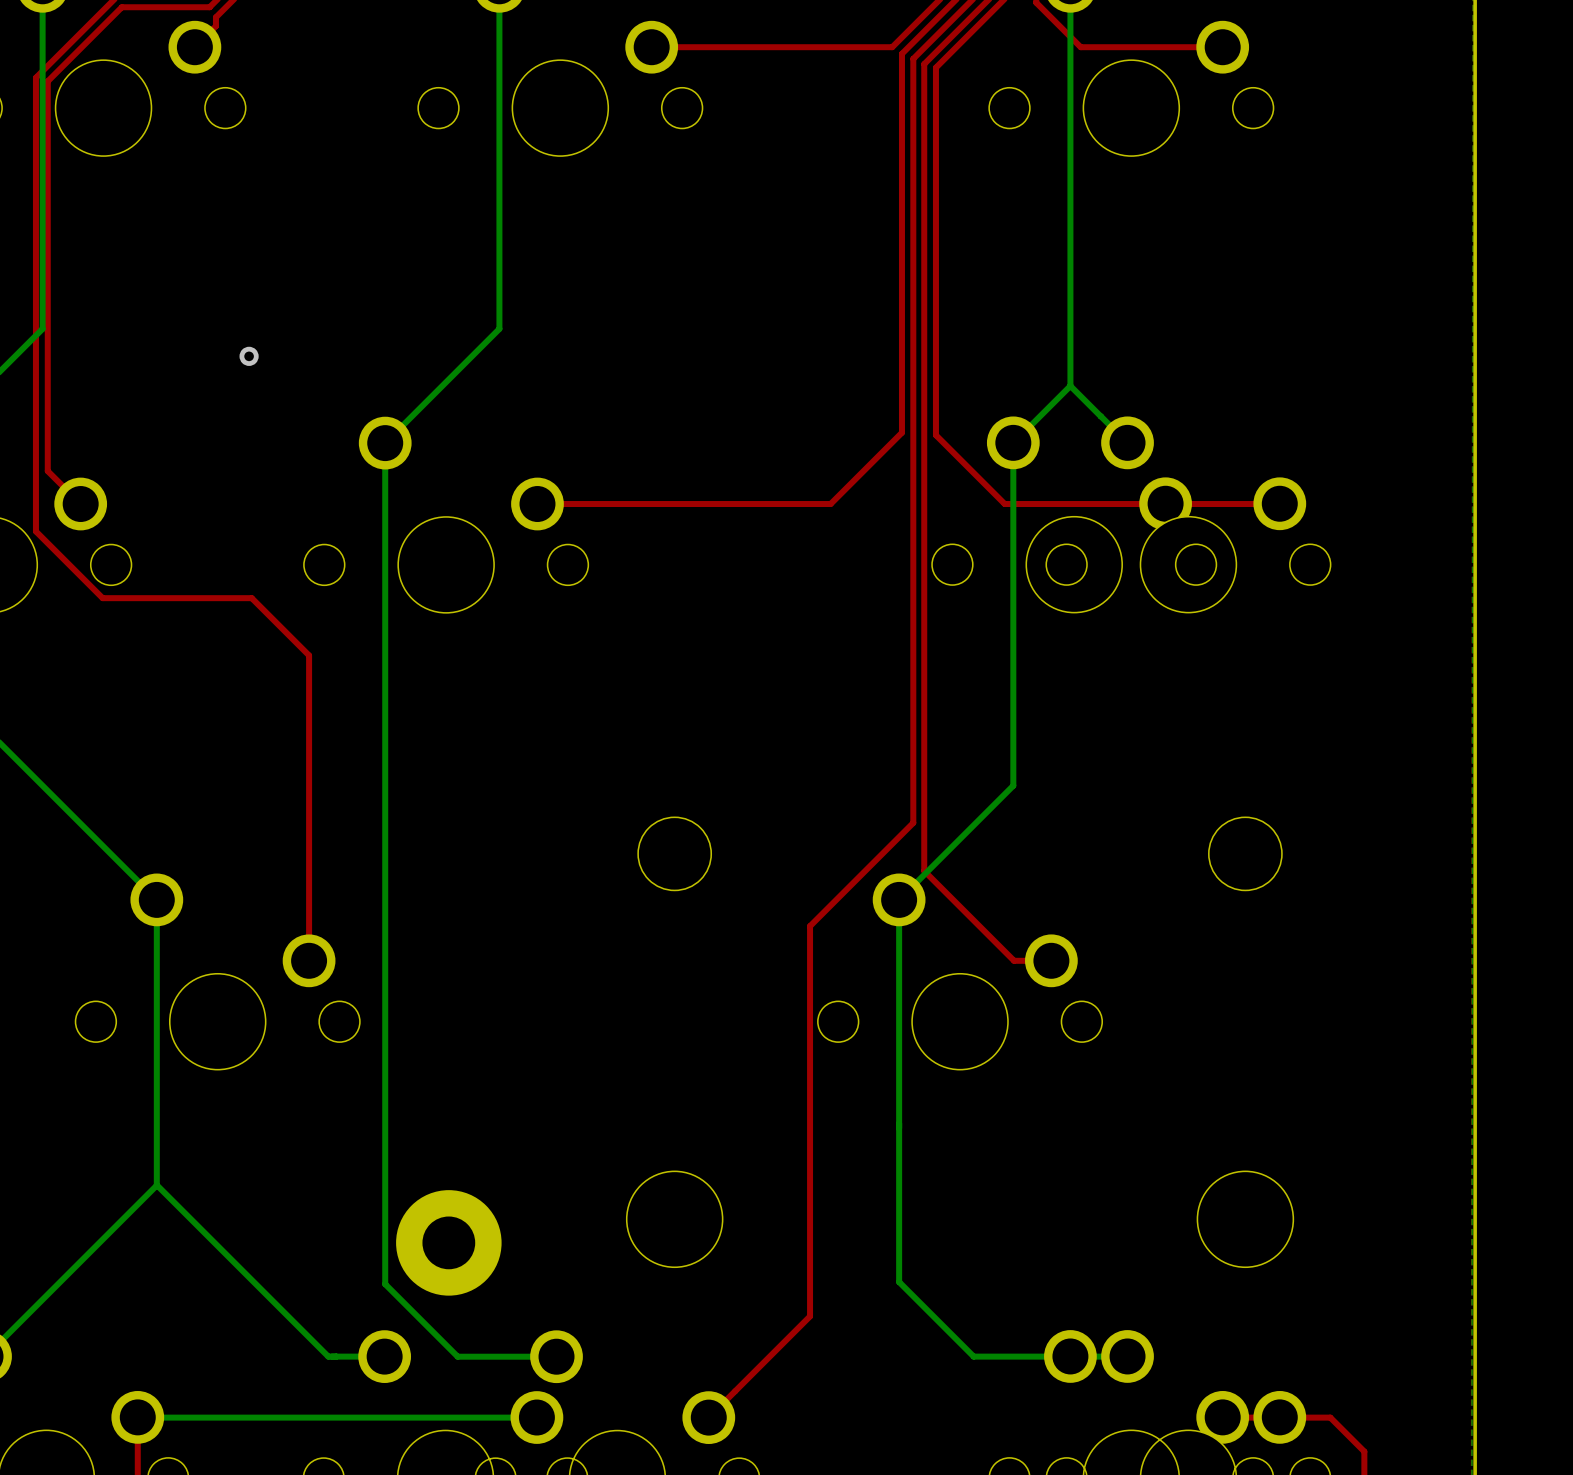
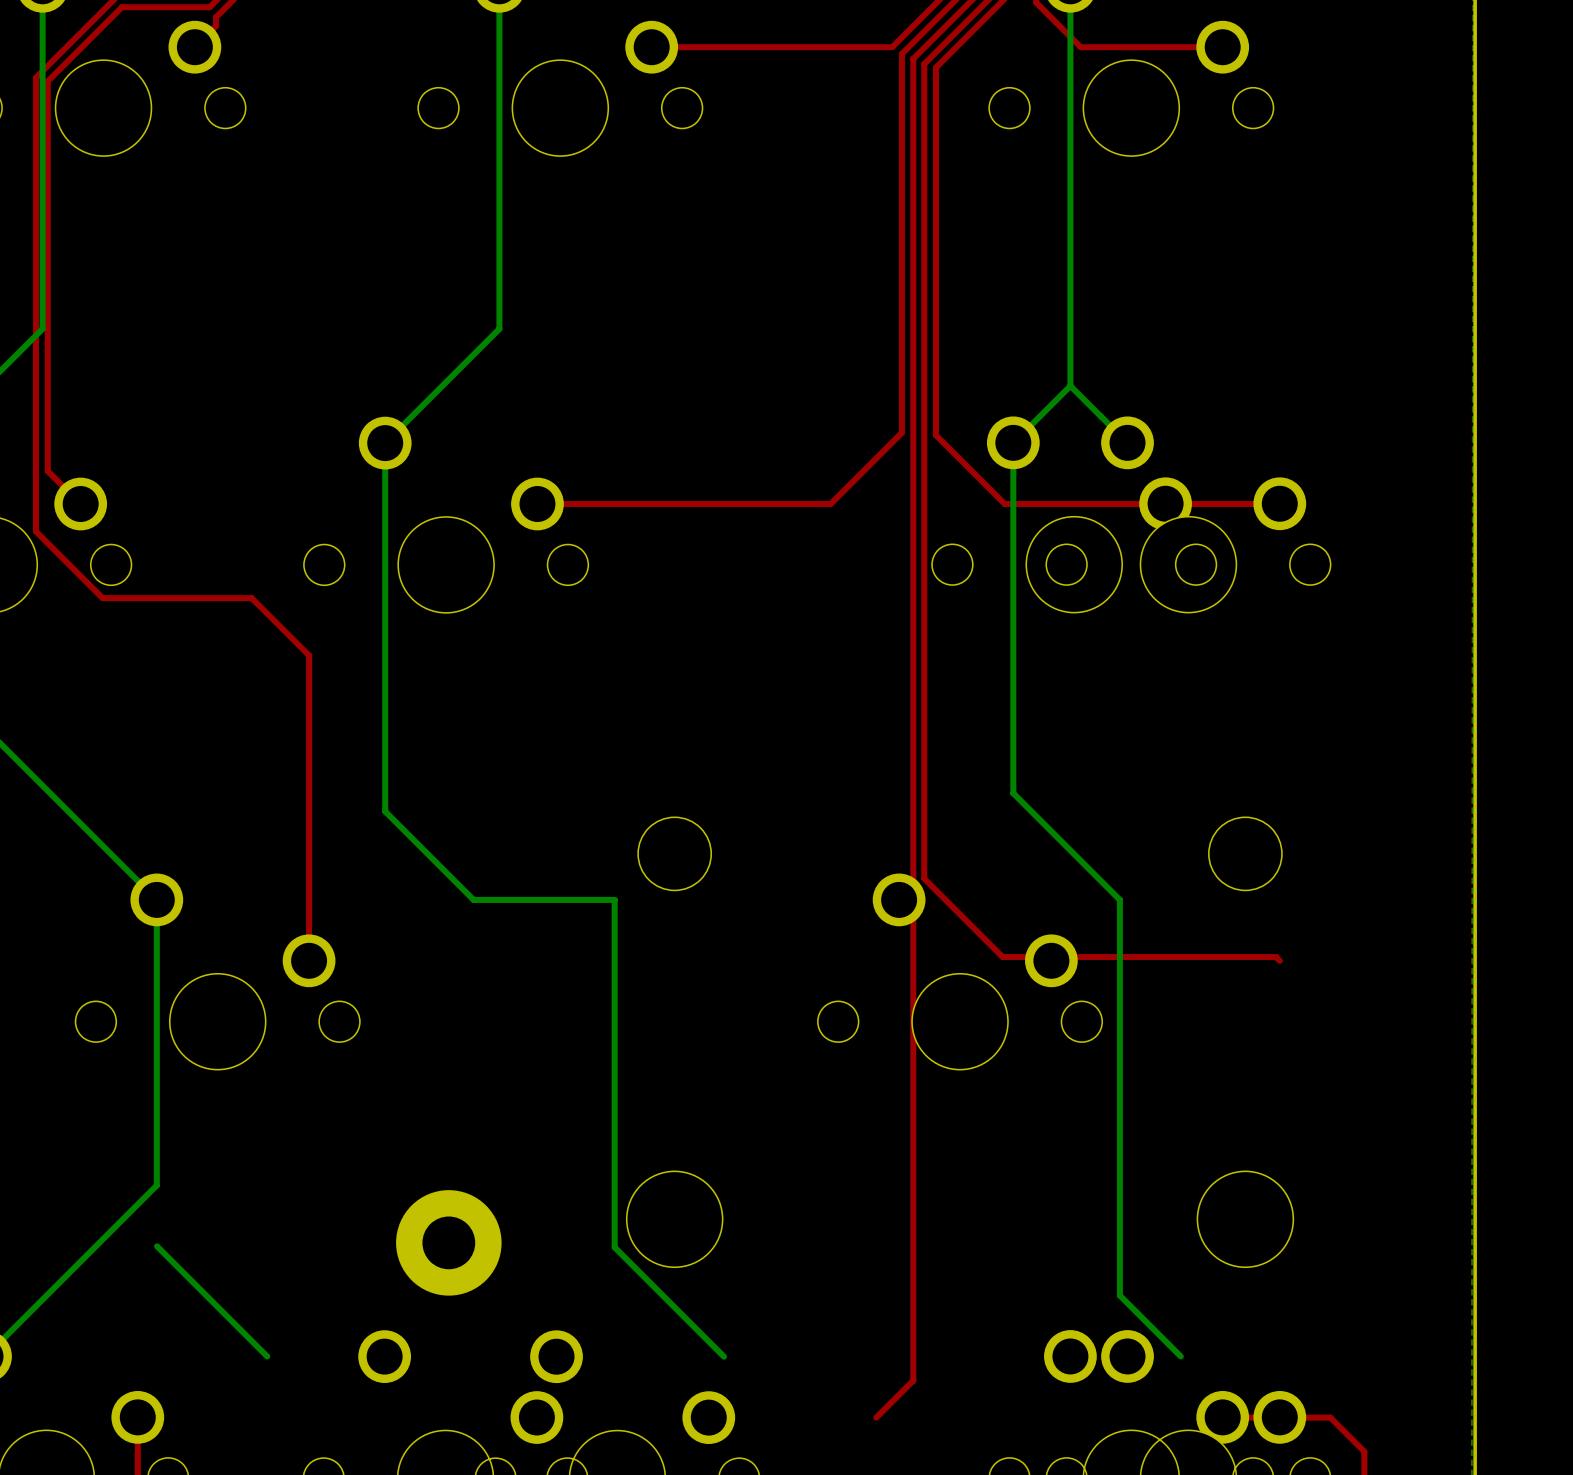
via: (249, 356) -> none
bottom track: (1013, 785) (899, 899) (899, 1282) (973, 1356) (1127, 1356) -> (1013, 785) (1013, 793) (1119, 899) (1119, 1295) (1180, 1356)
bottom track: (385, 811) (385, 1284) (457, 1356) (556, 1356) -> (385, 811) (473, 899) (614, 899) (614, 1247) (724, 1356)
top track: (913, 822) (810, 926) (810, 1316) (708, 1417) -> (913, 822) (913, 1380) (876, 1417)
top track: (924, 870) (1014, 960) (1051, 960) -> (924, 870) (924, 878) (1002, 957) (1275, 957) (1279, 960)
bottom track: (157, 1185) (328, 1356) (384, 1356) -> none
bottom track: none -> (157, 1246) (267, 1356)
bottom track: (536, 1417) (137, 1417) -> none

